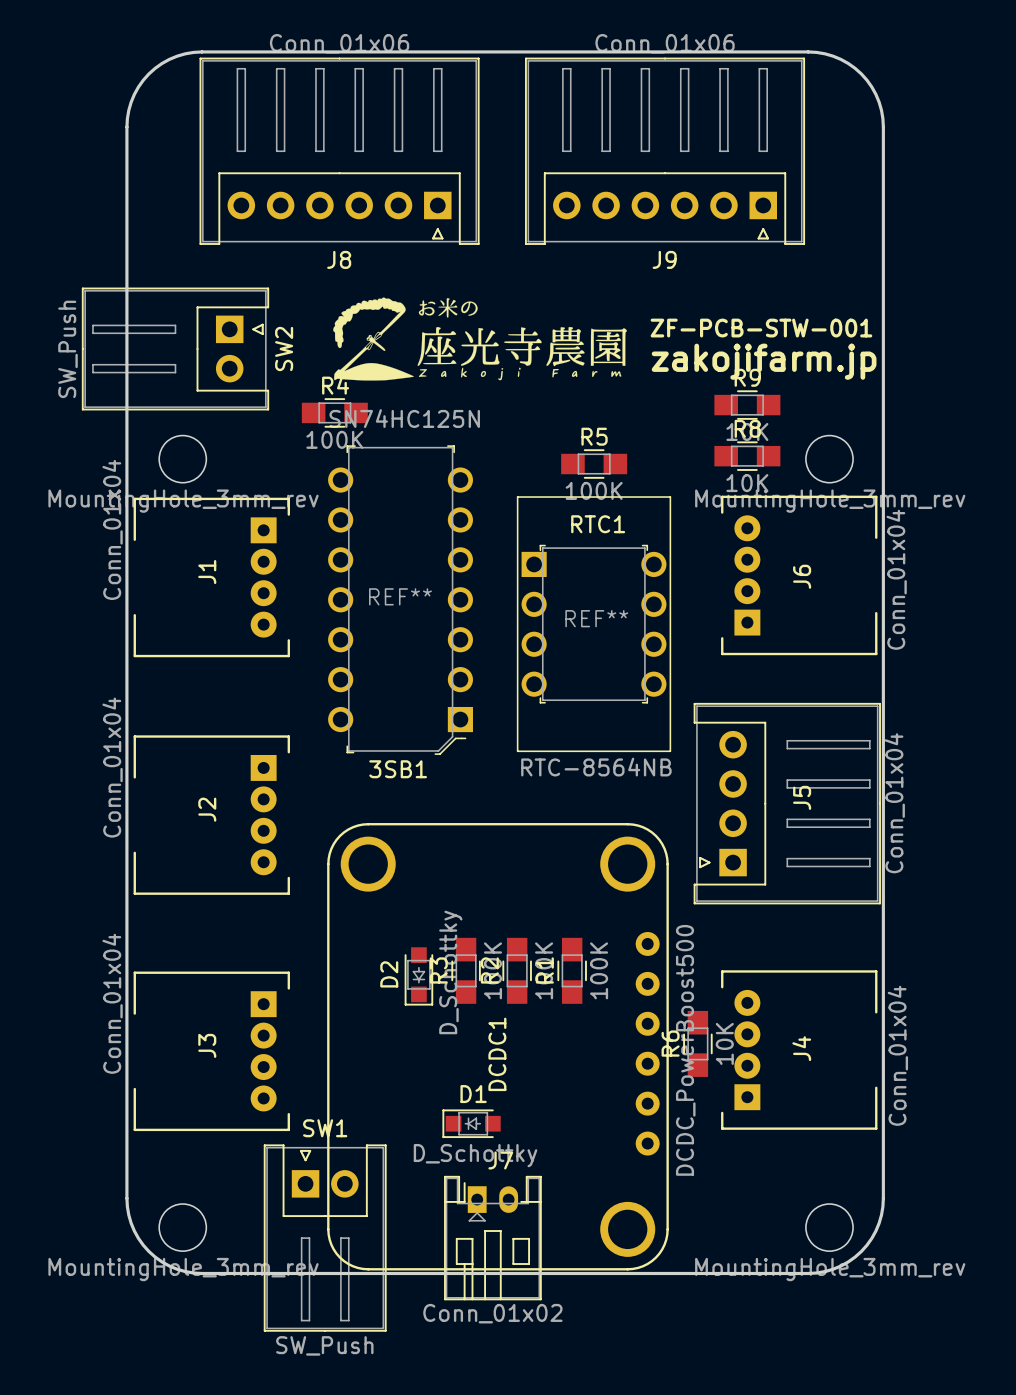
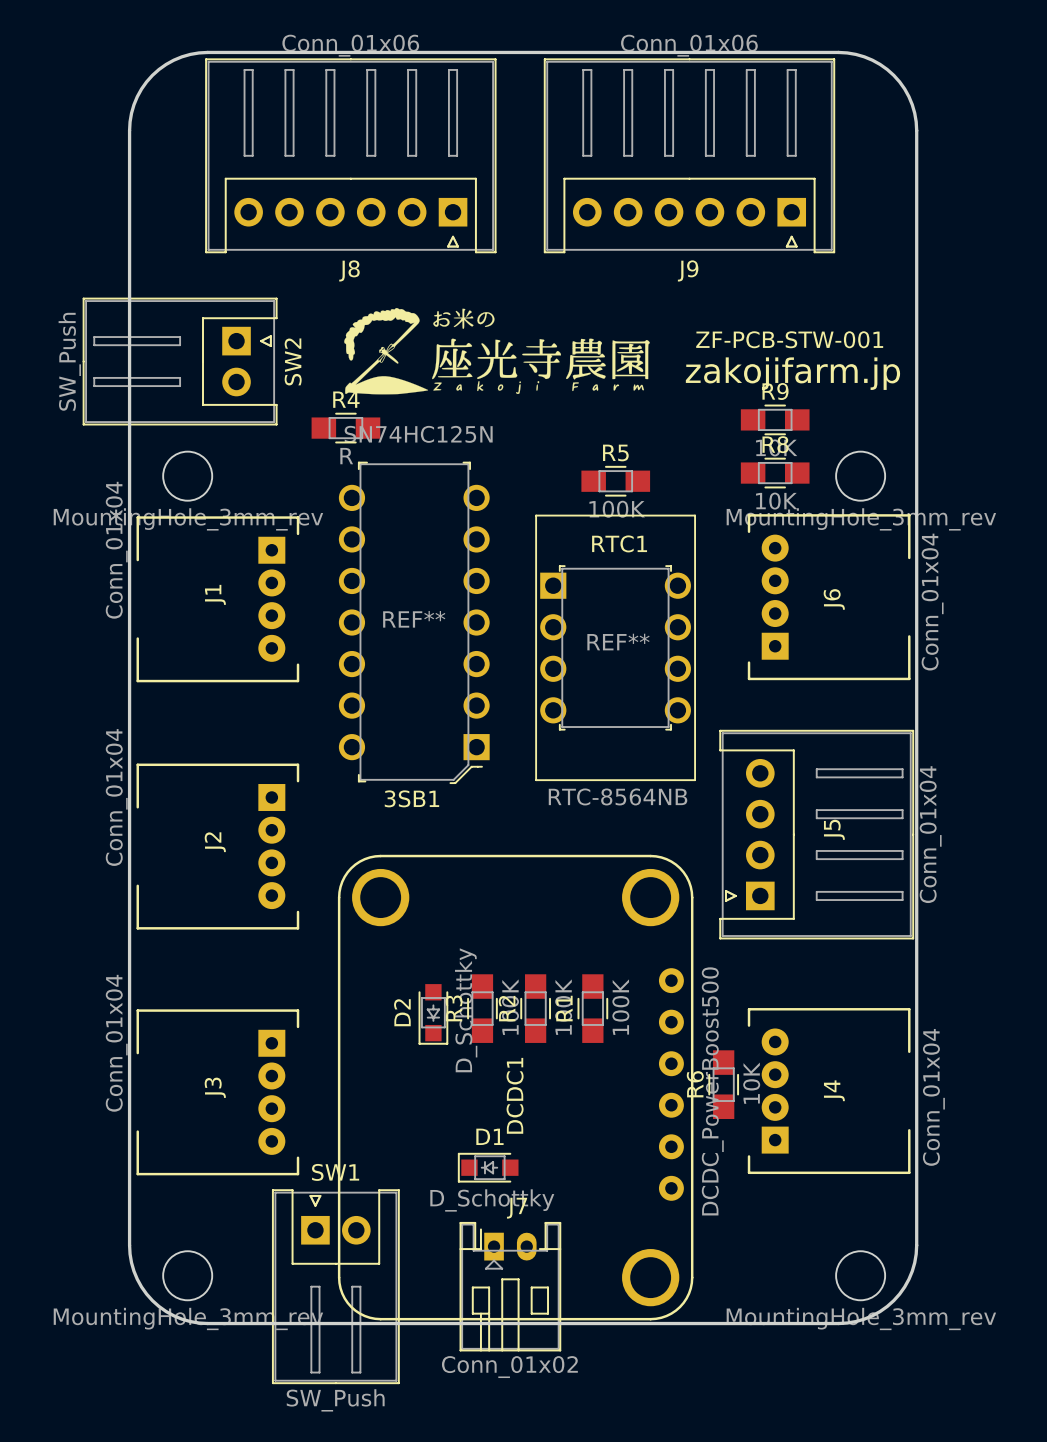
R4 value: 100K (334, 439) -> R (346, 456)

